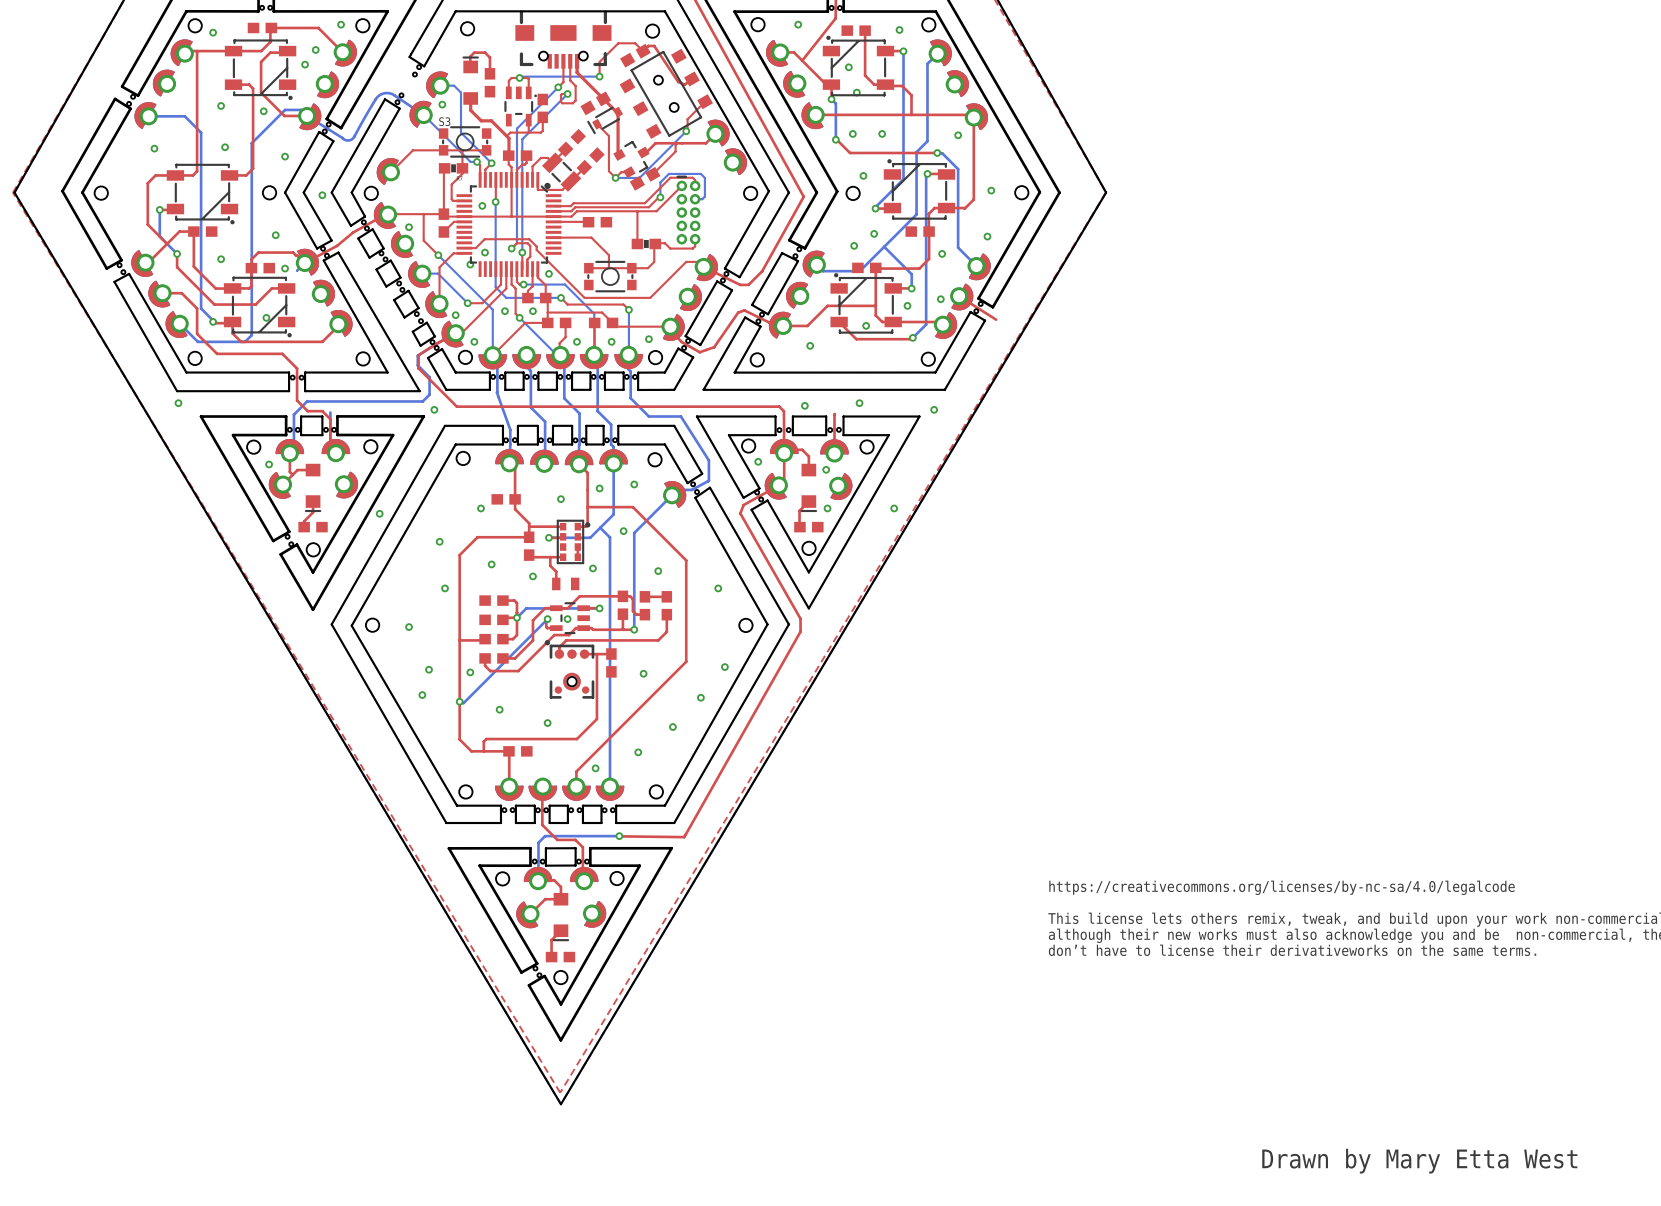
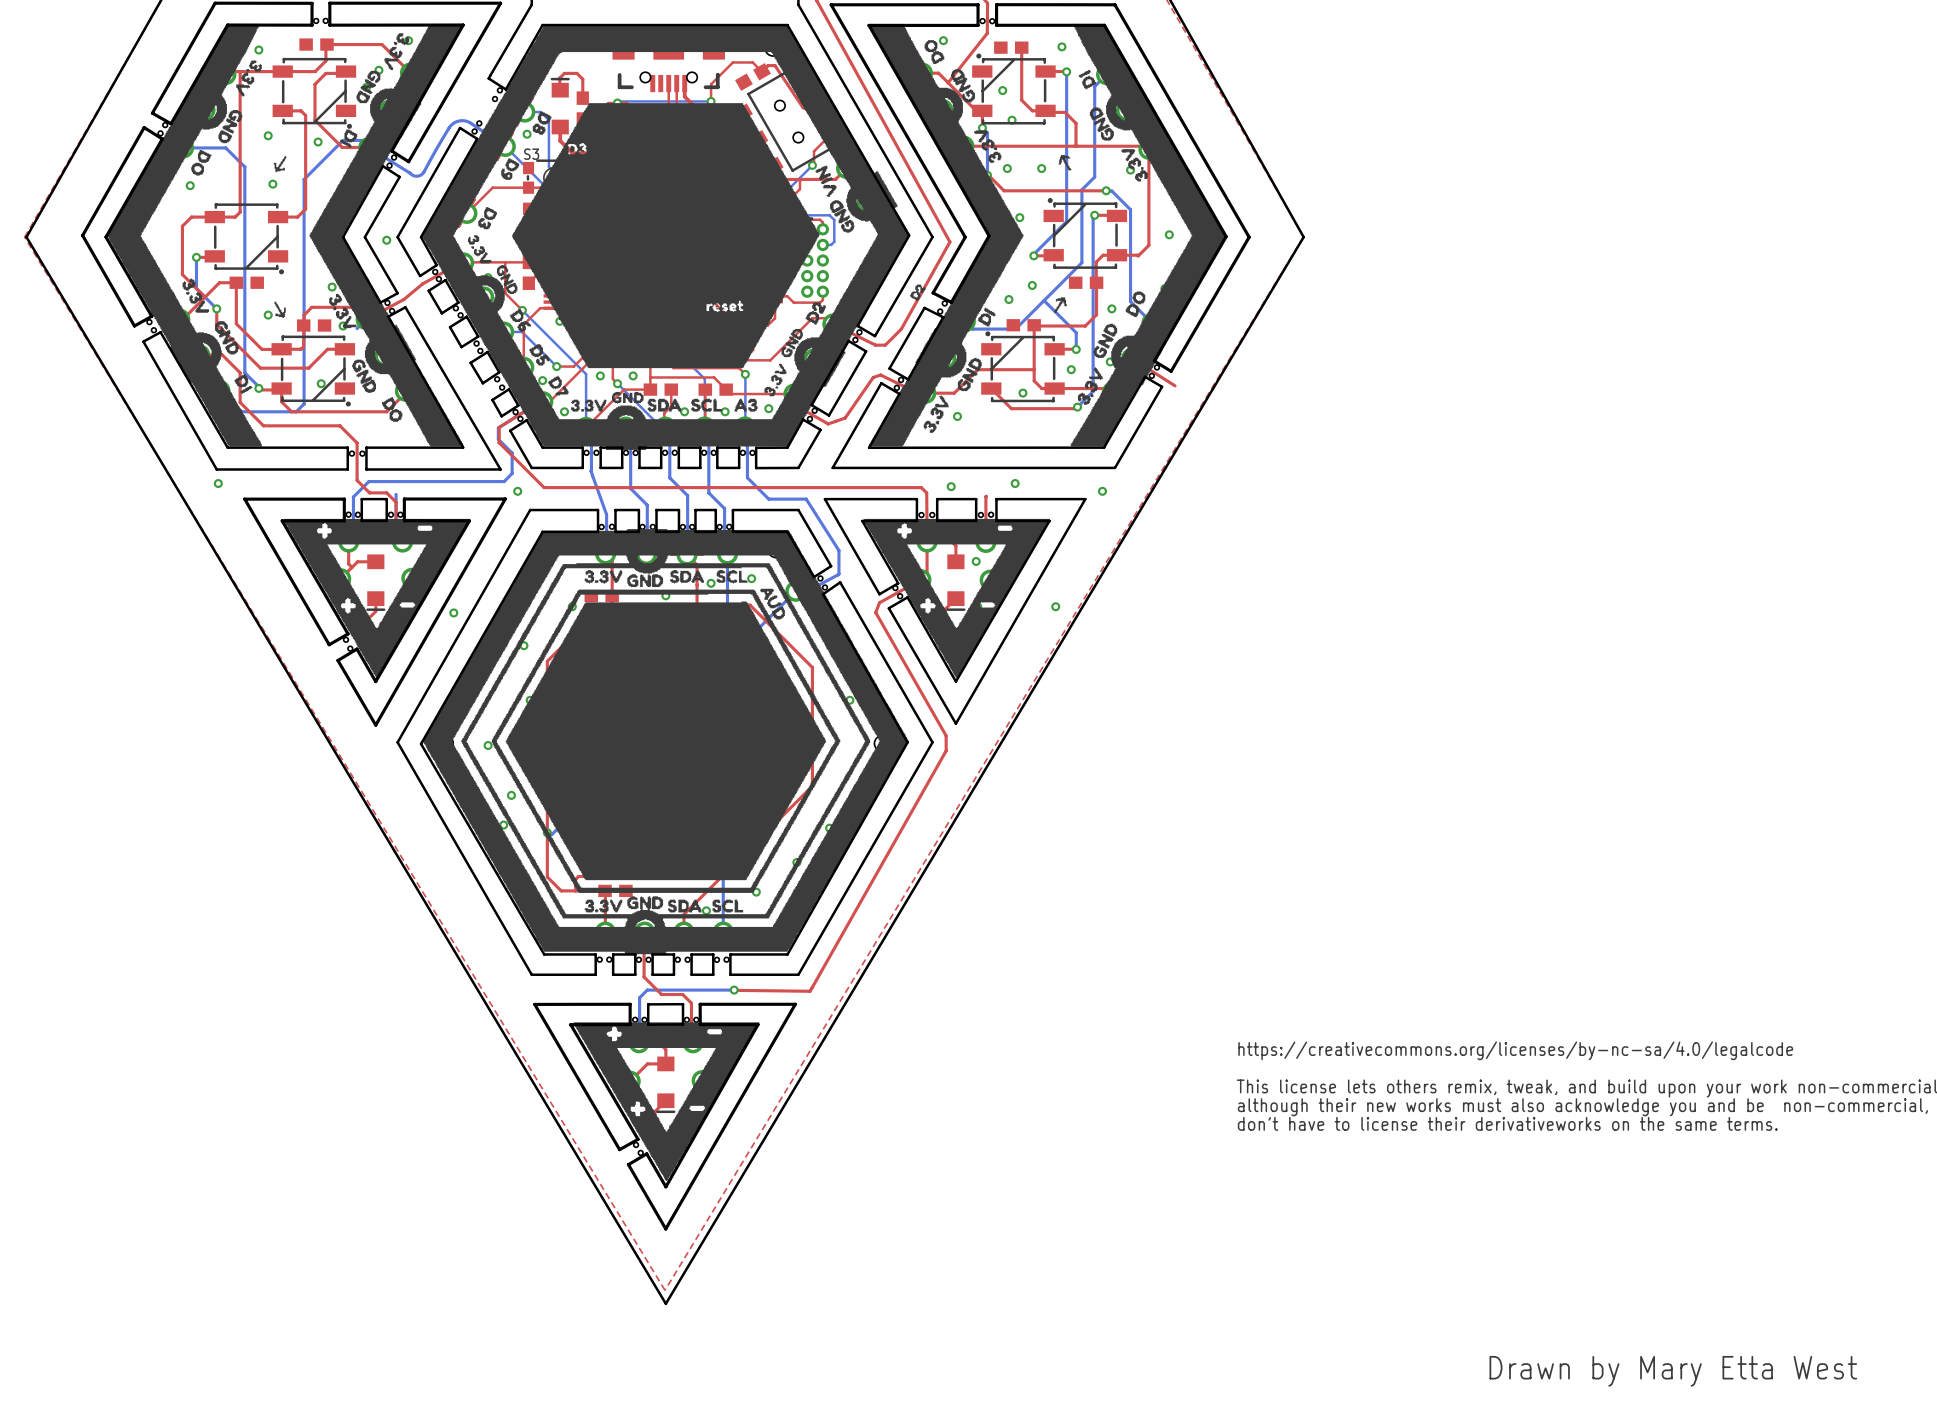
drawing: none -> [107, 23, 1226, 1181]

